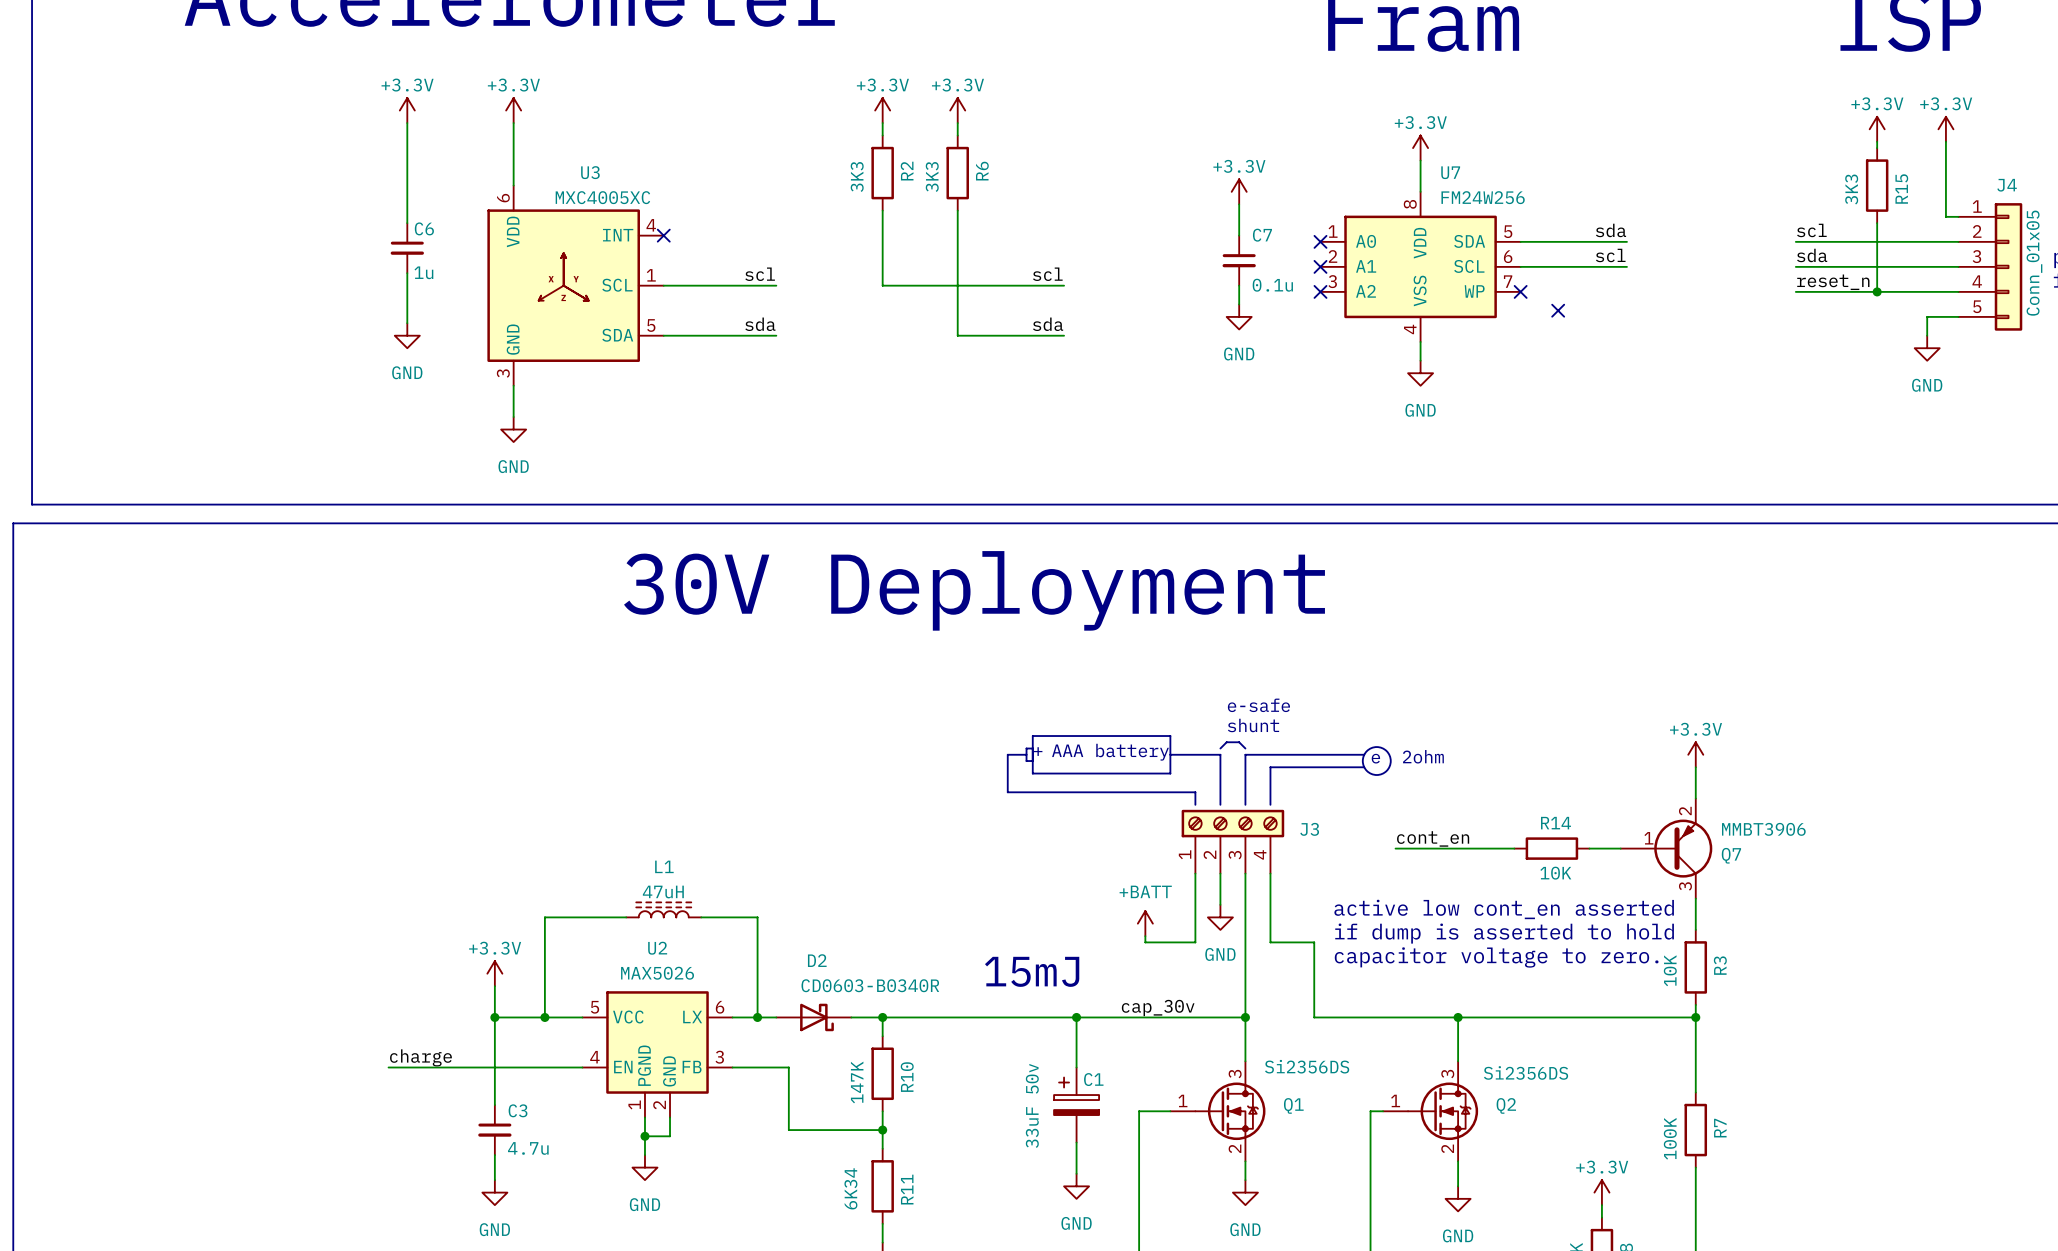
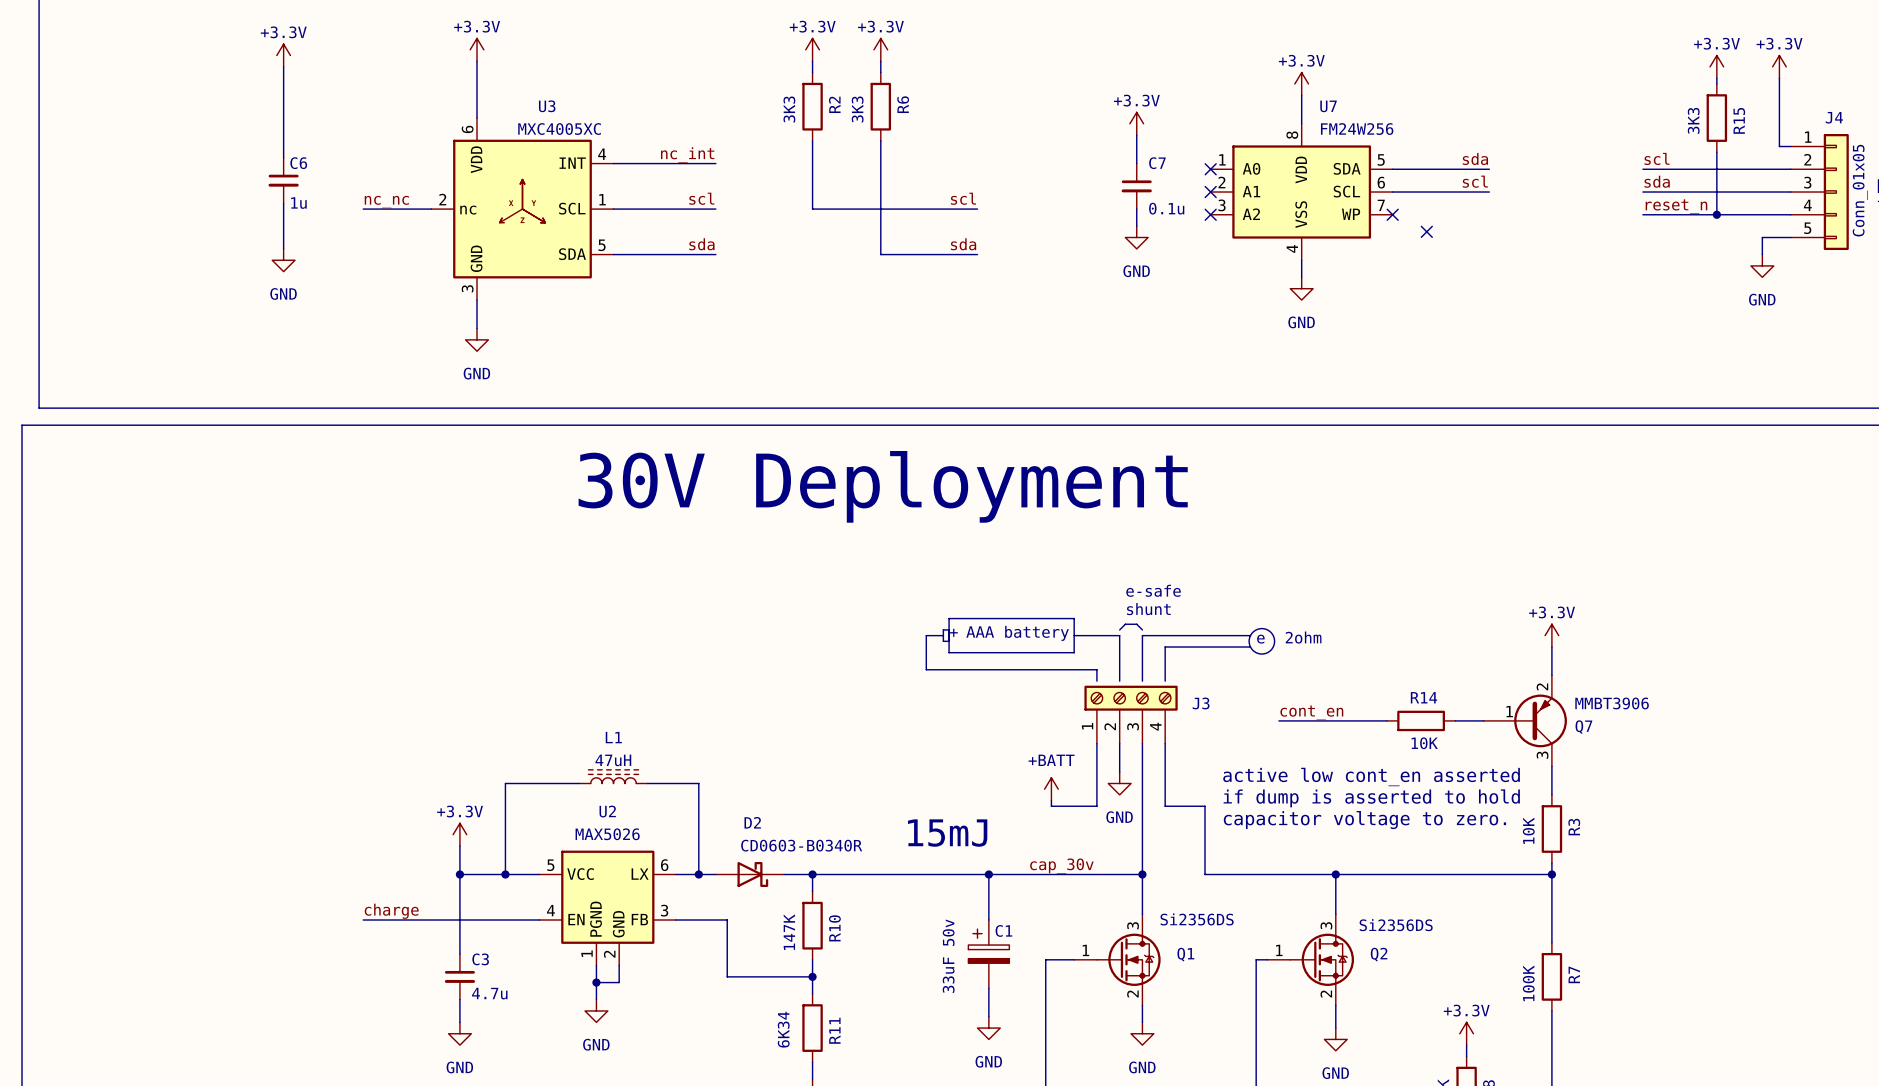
power symbol position: +3.3V (407, 110) -> +3.3V (283, 55)
wire: (407, 123) (407, 223) -> (283, 66) (283, 157)
U3 symbol: [487, 185, 664, 386] -> [431, 118, 614, 301]
label: none -> nc_int (687, 155)
wire: none -> (613, 163) (715, 163)
no-connect mark: (663, 235) -> none
C6 position: (407, 248) -> (283, 180)
wire: (407, 273) (407, 323) -> (283, 203) (283, 248)
label: none -> nc_nc (386, 202)
wire: none -> (363, 209) (431, 209)
power symbol position: GND (407, 335) -> GND (283, 260)

